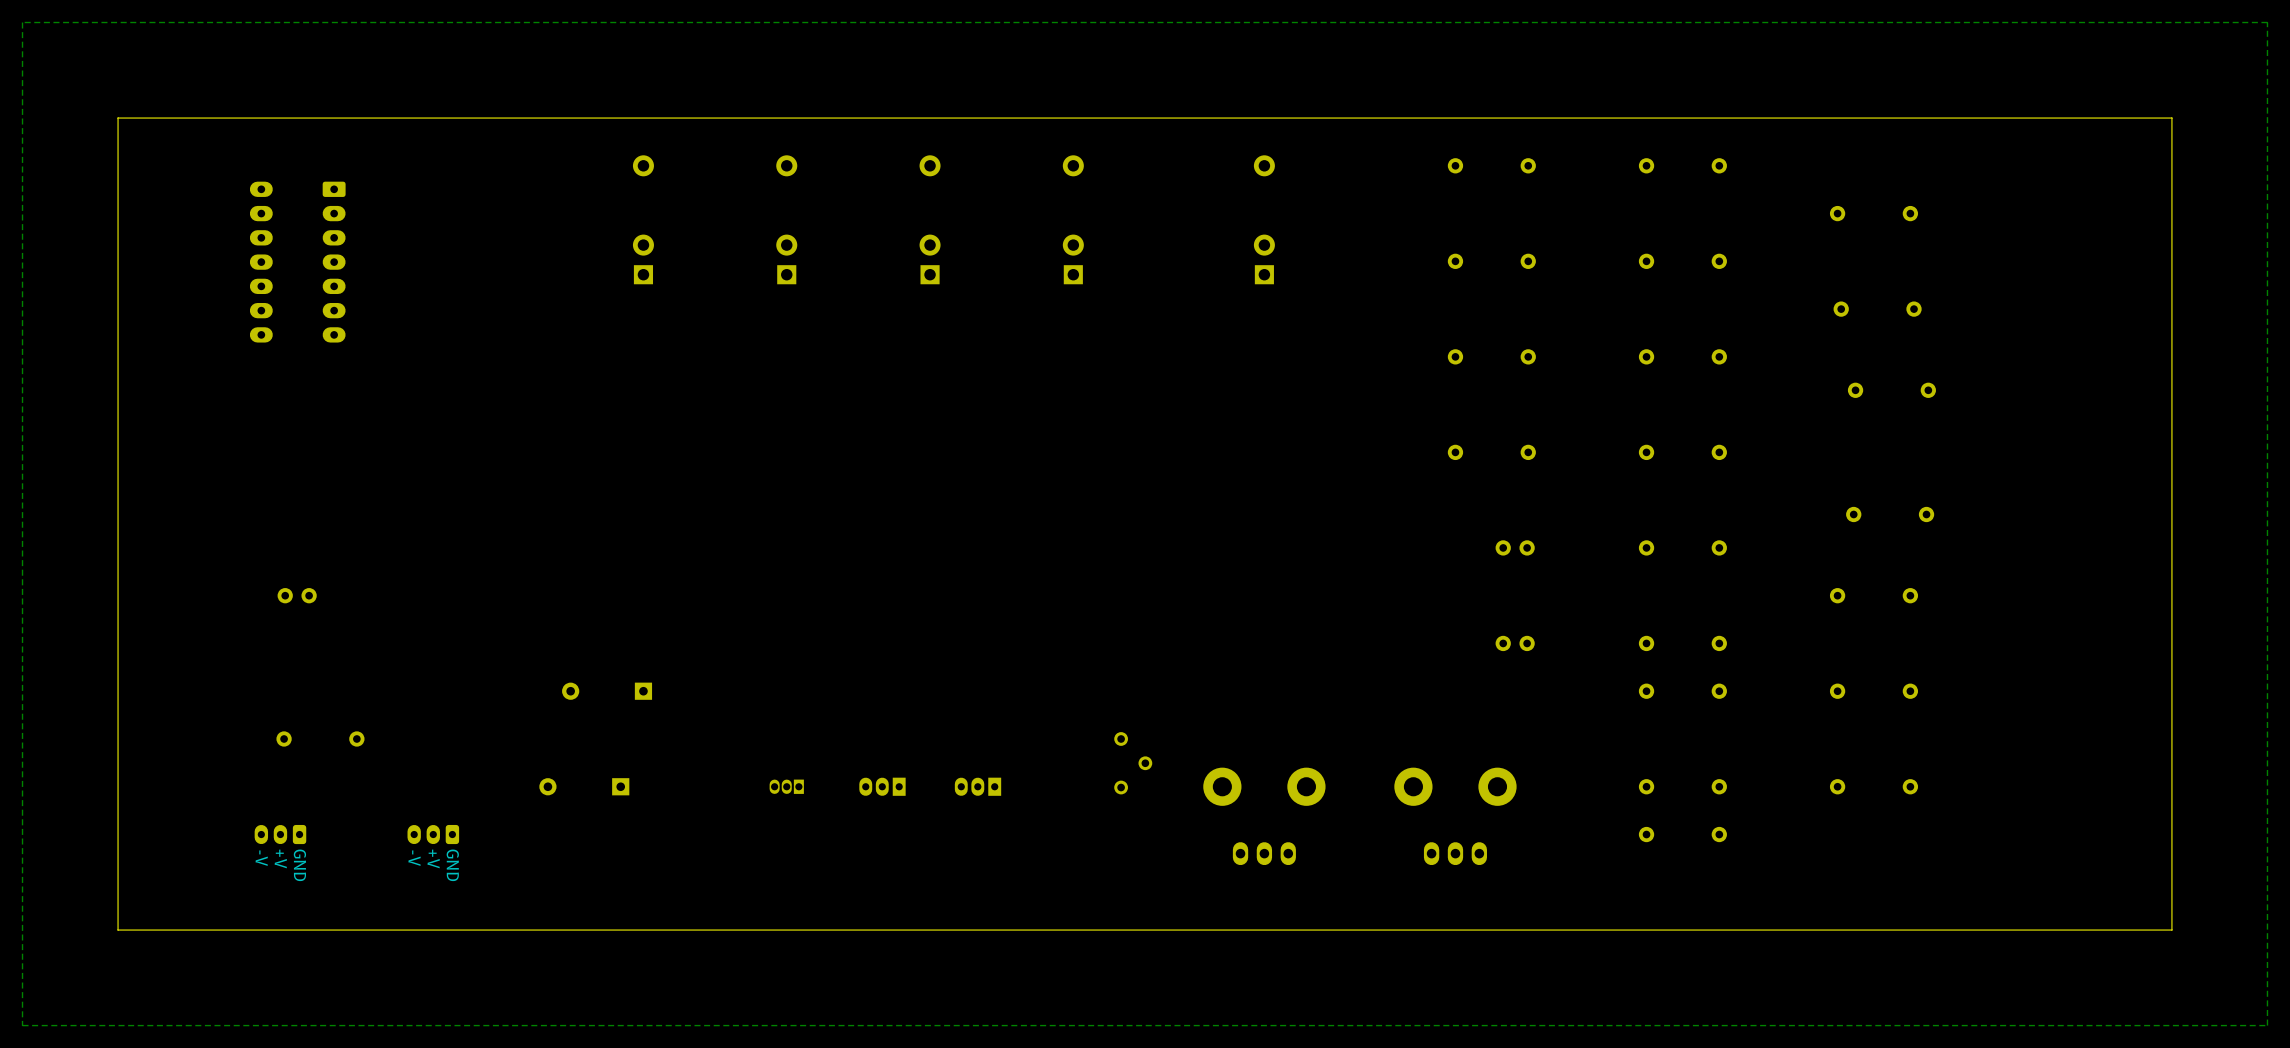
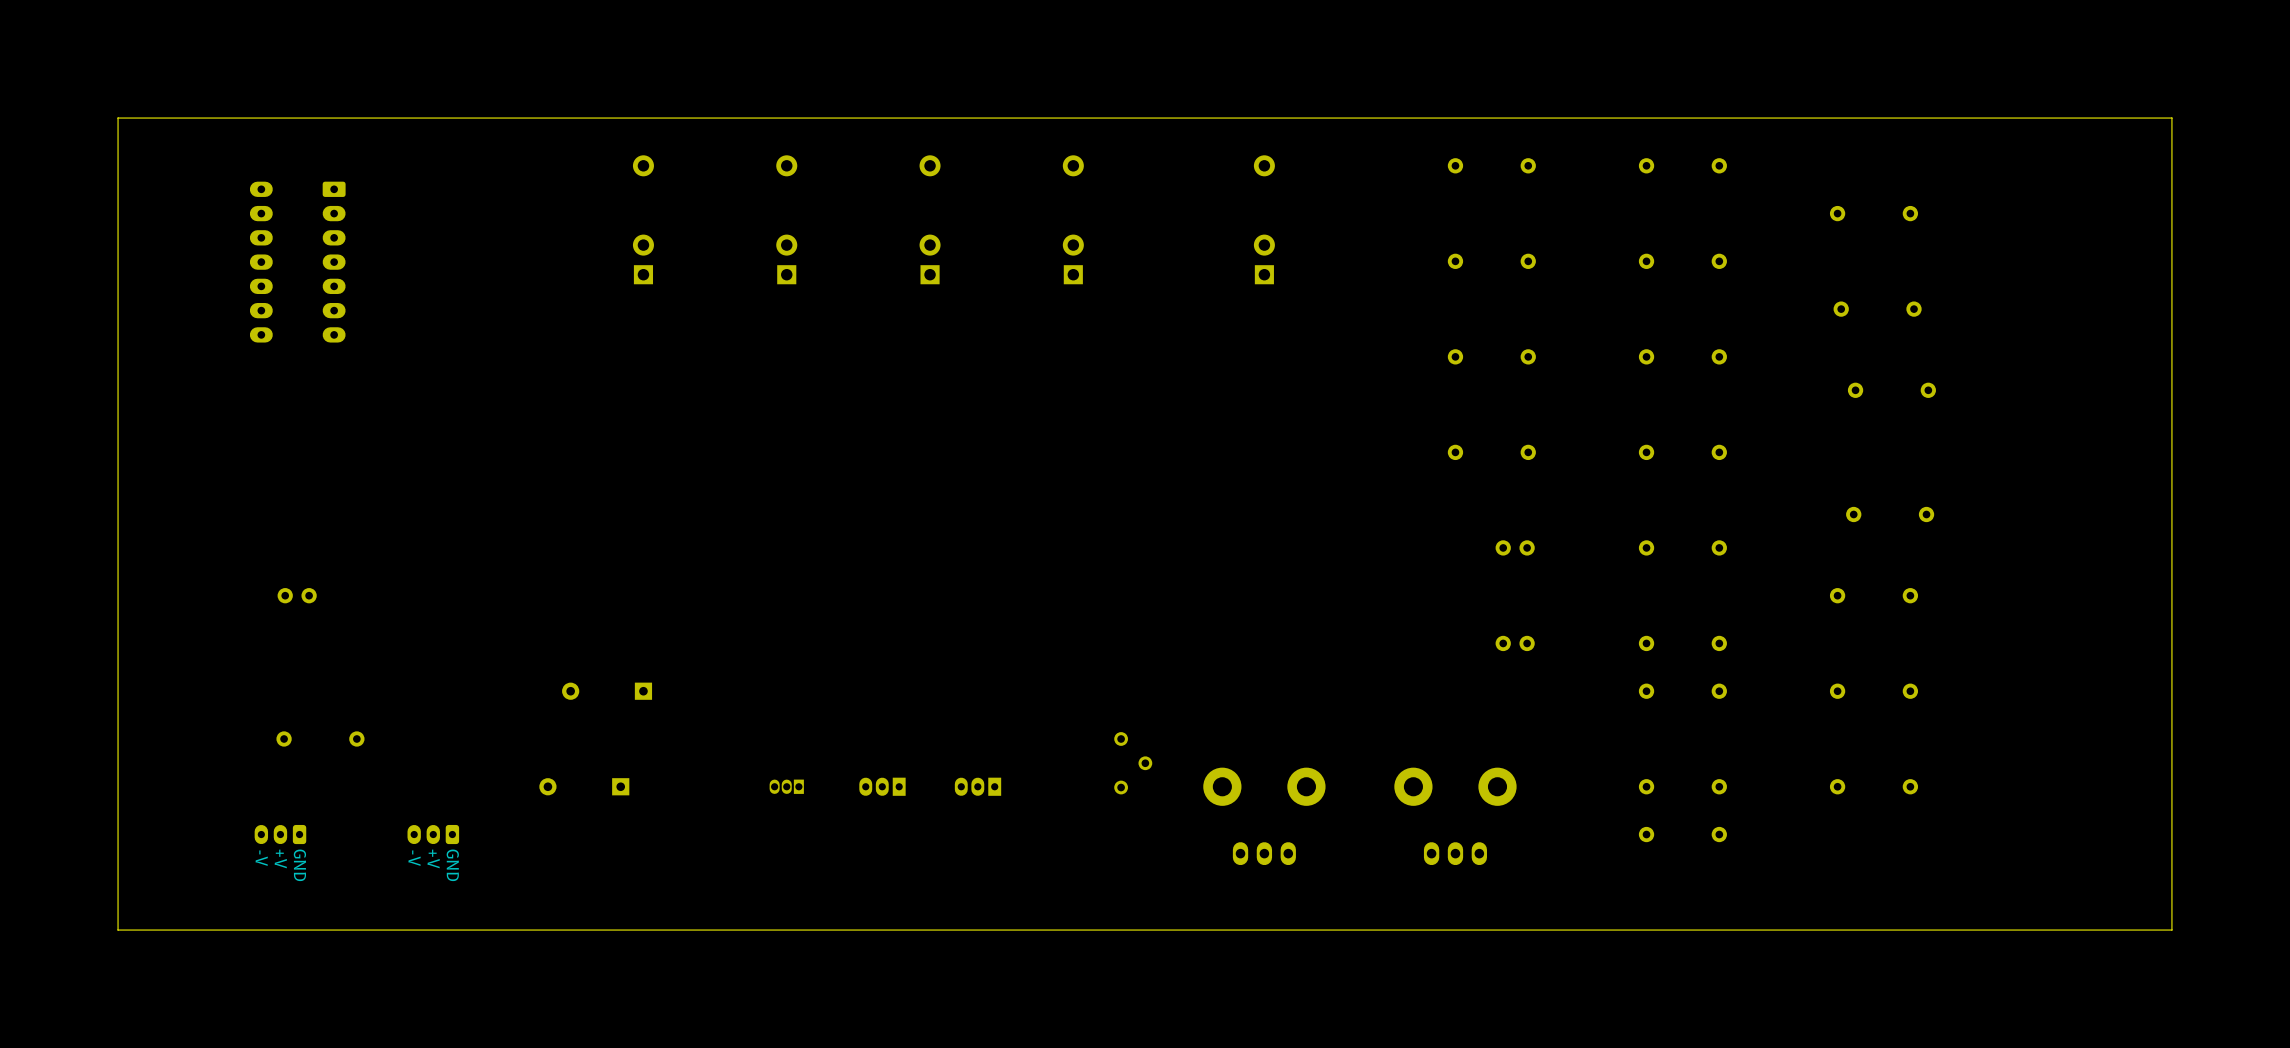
zone outline: (2267, 22) (22, 22) (22, 1025) (2267, 1025) (2267, 22) -> none

